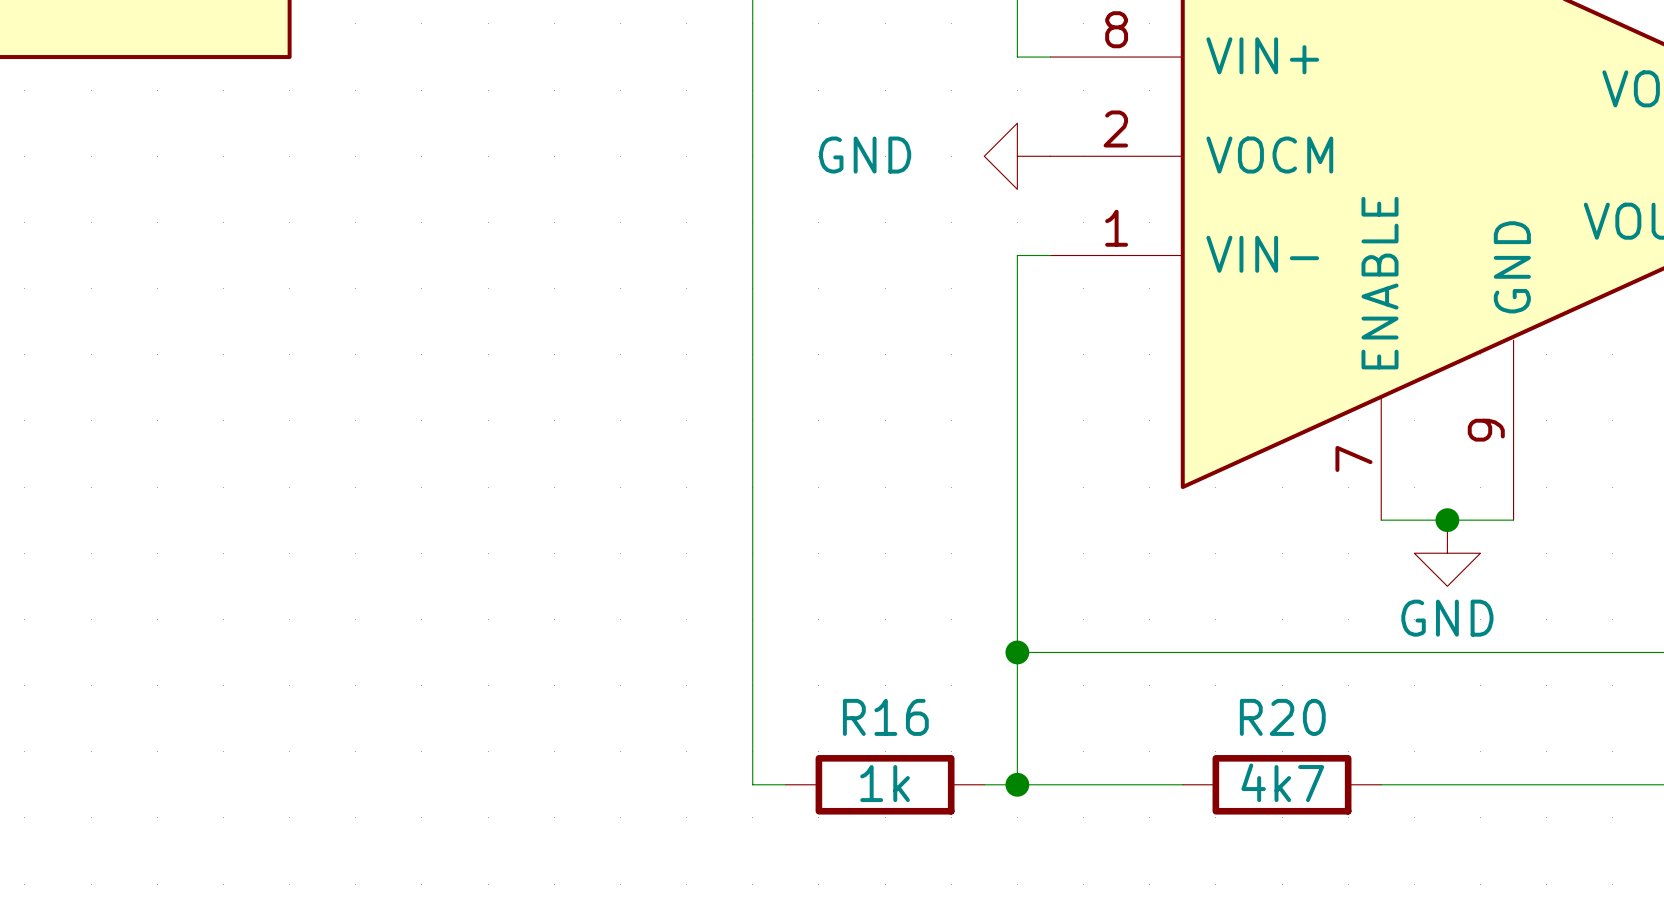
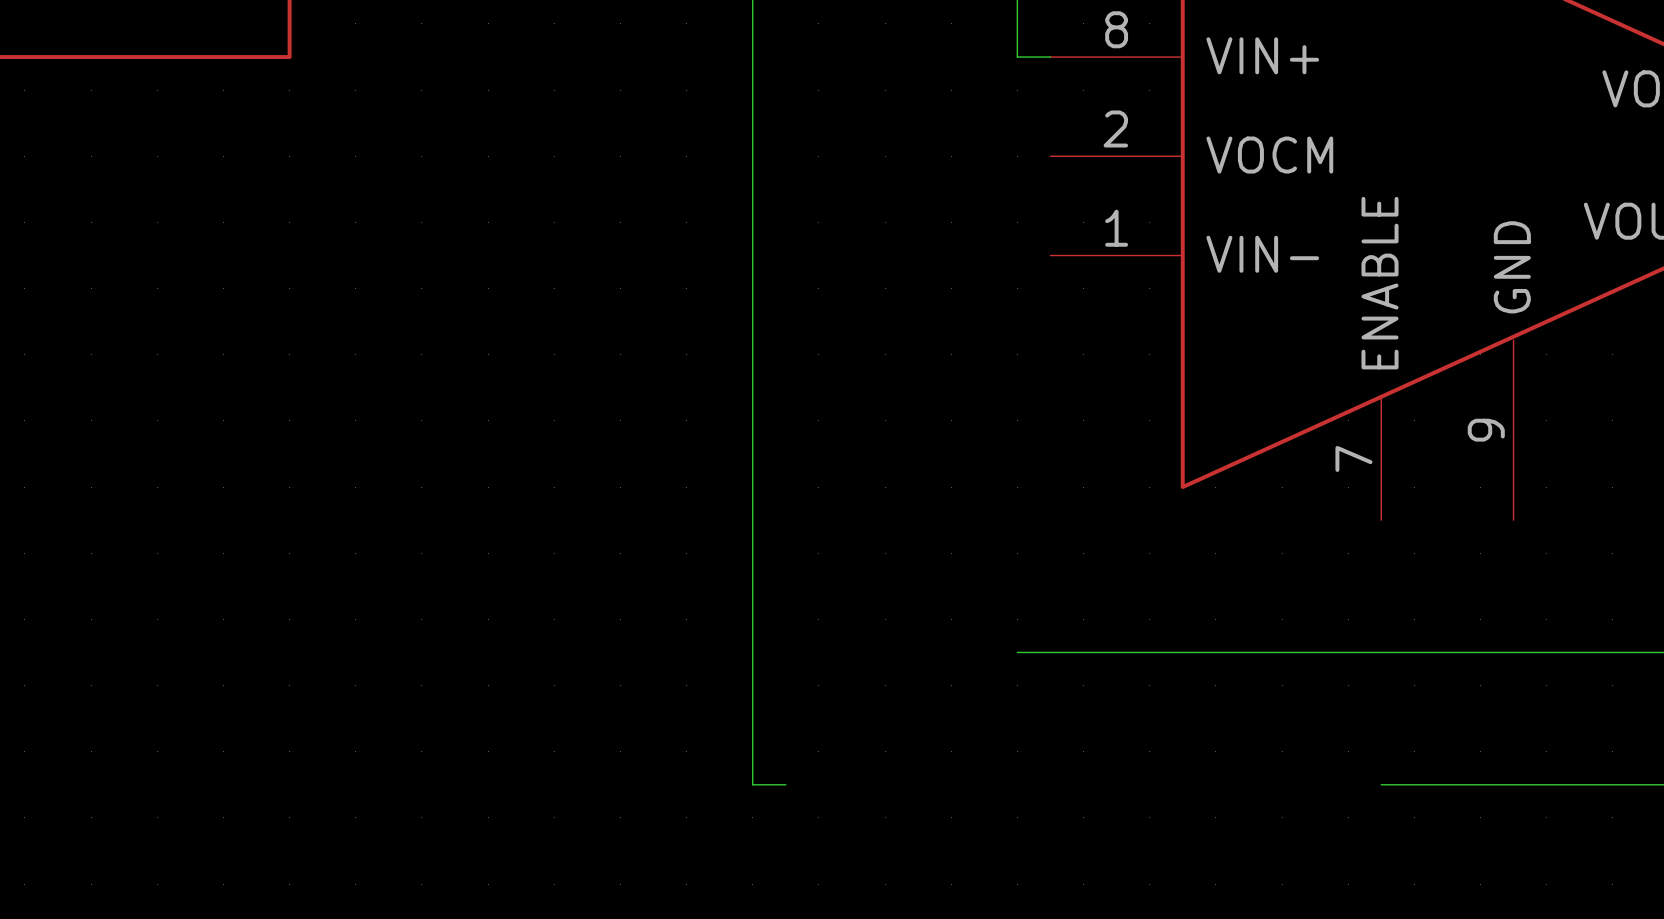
power symbol: GND (1017, 156) -> none
wire: (1050, 255) (1017, 255) (1017, 784) -> none
wire: (1381, 520) (1513, 520) -> none
junction: (1447, 520) -> none
power symbol: GND (1447, 553) -> none
junction: (1017, 652) -> none
R16: 1k (885, 784) -> none
wire: (984, 784) (1182, 784) -> none
junction: (1017, 784) -> none
R20: 4k7 (1282, 784) -> none

